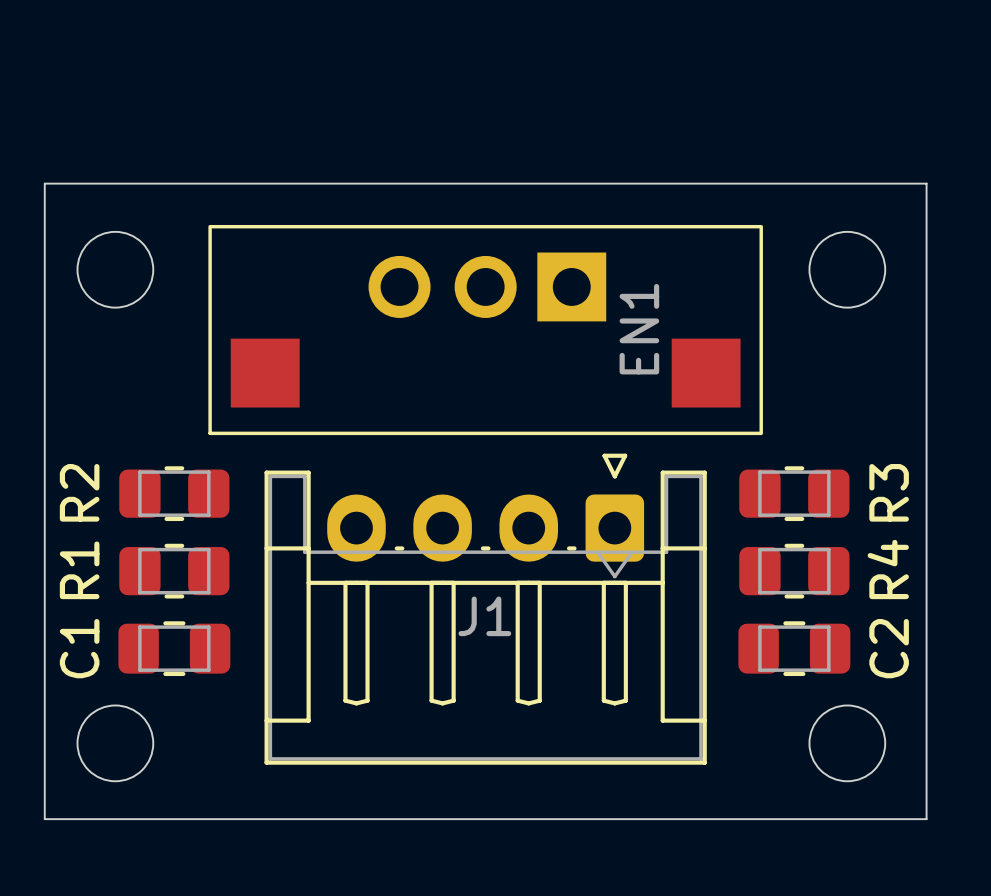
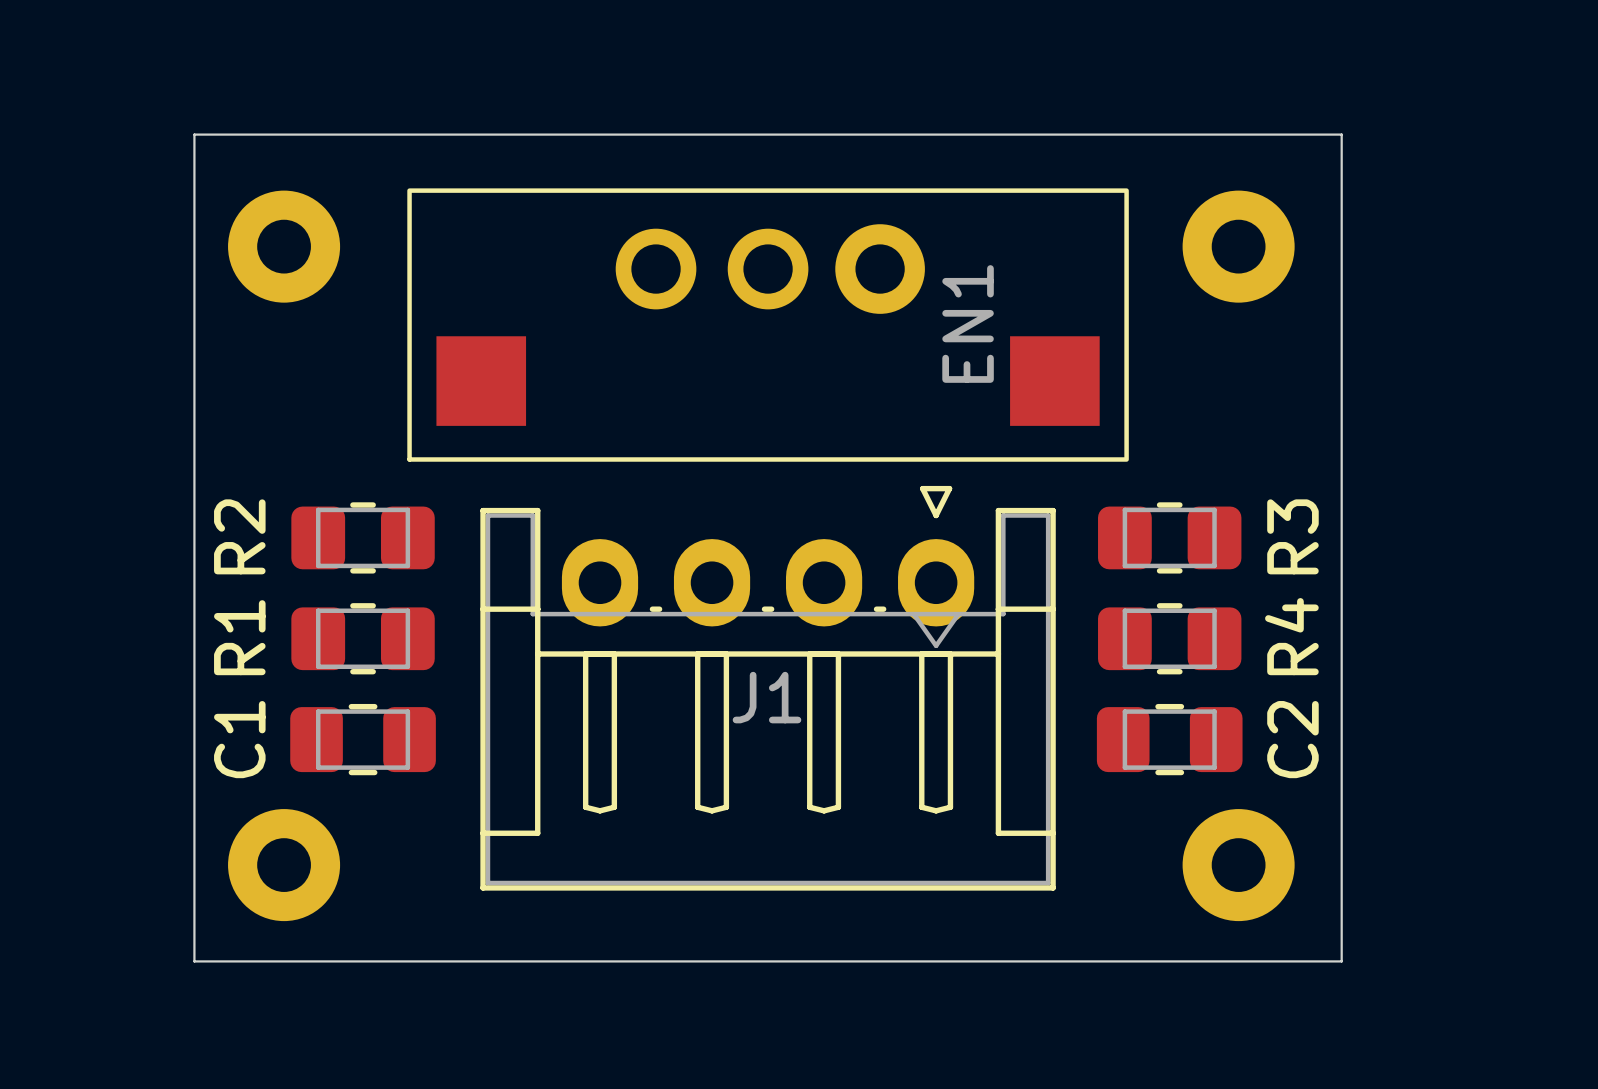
EN1 footprint: [208, 224, 763, 436] -> [407, 188, 1129, 462]
round board edge: [76, 230, 155, 309] -> none
round board edge: [808, 230, 887, 309] -> none
part: none -> (284, 246)
part: none -> (1238, 246)
J1 footprint: [264, 453, 707, 765] -> [480, 485, 1056, 891]
round board edge: [76, 704, 155, 783] -> none
round board edge: [808, 704, 887, 783] -> none
part: none -> (284, 865)
part: none -> (1238, 865)

